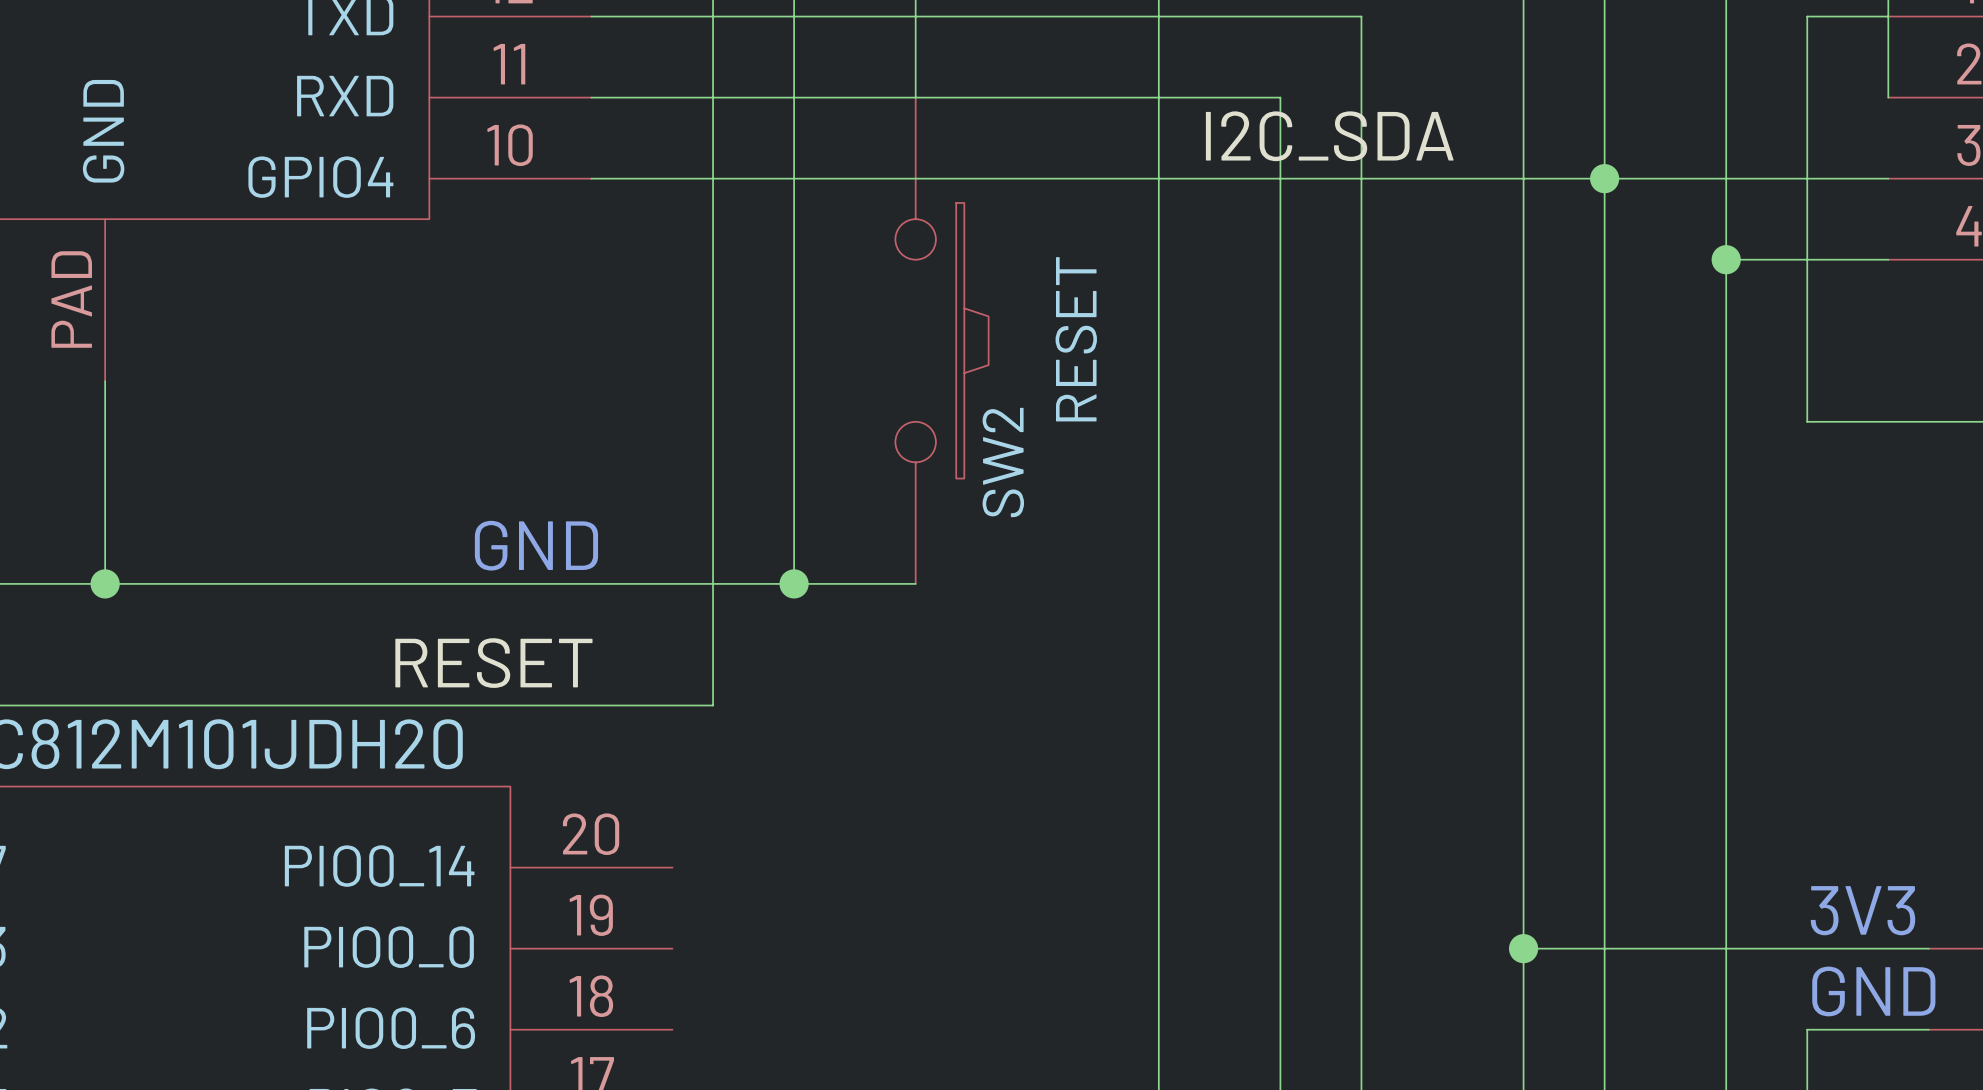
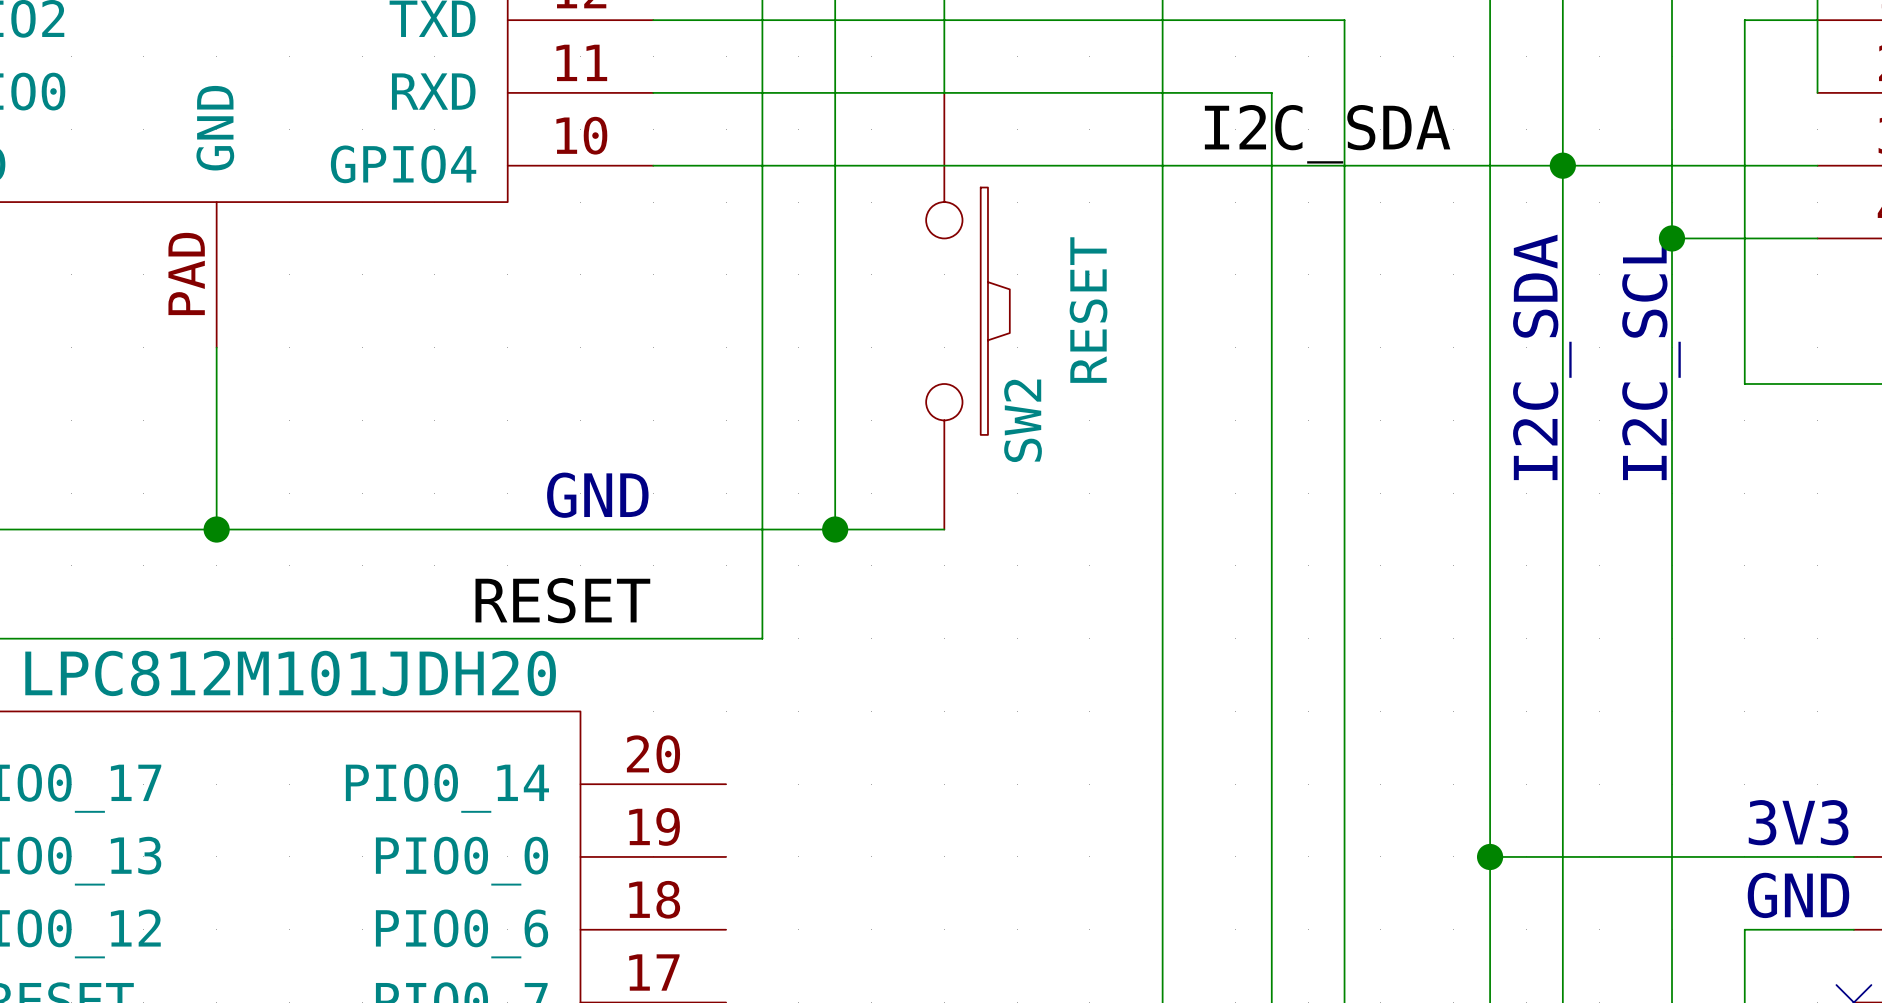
text: none -> I2C_SDA (1542, 357)
text: none -> I2C_SCL (1651, 358)

